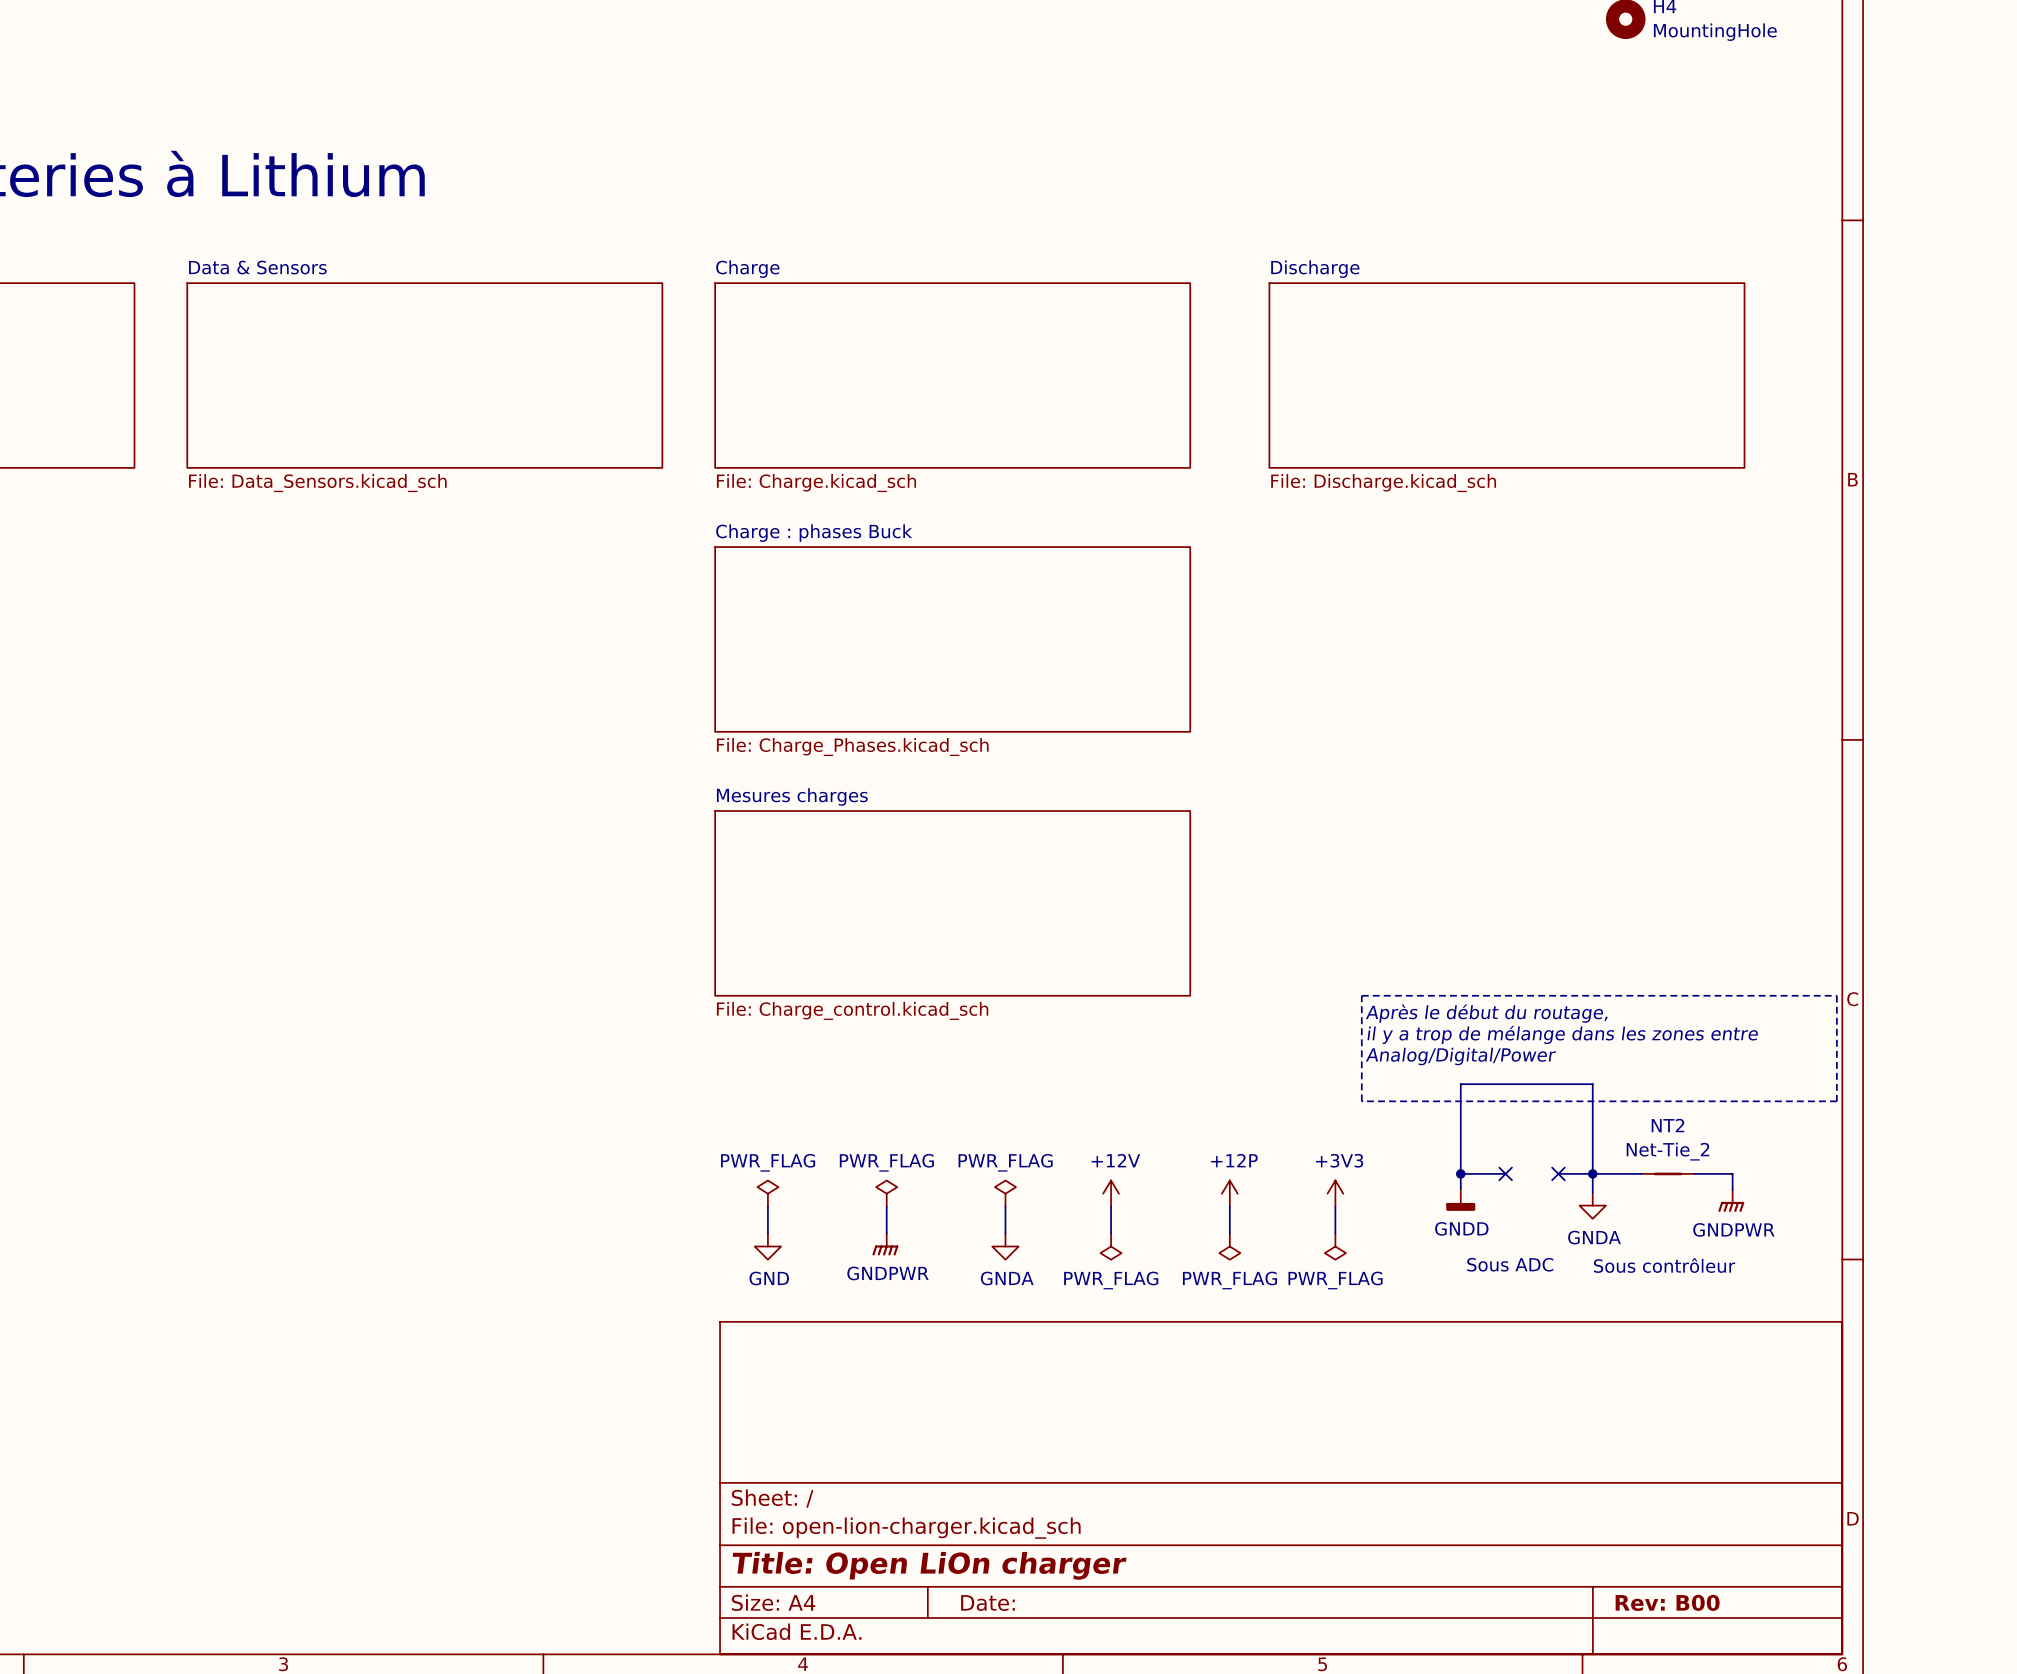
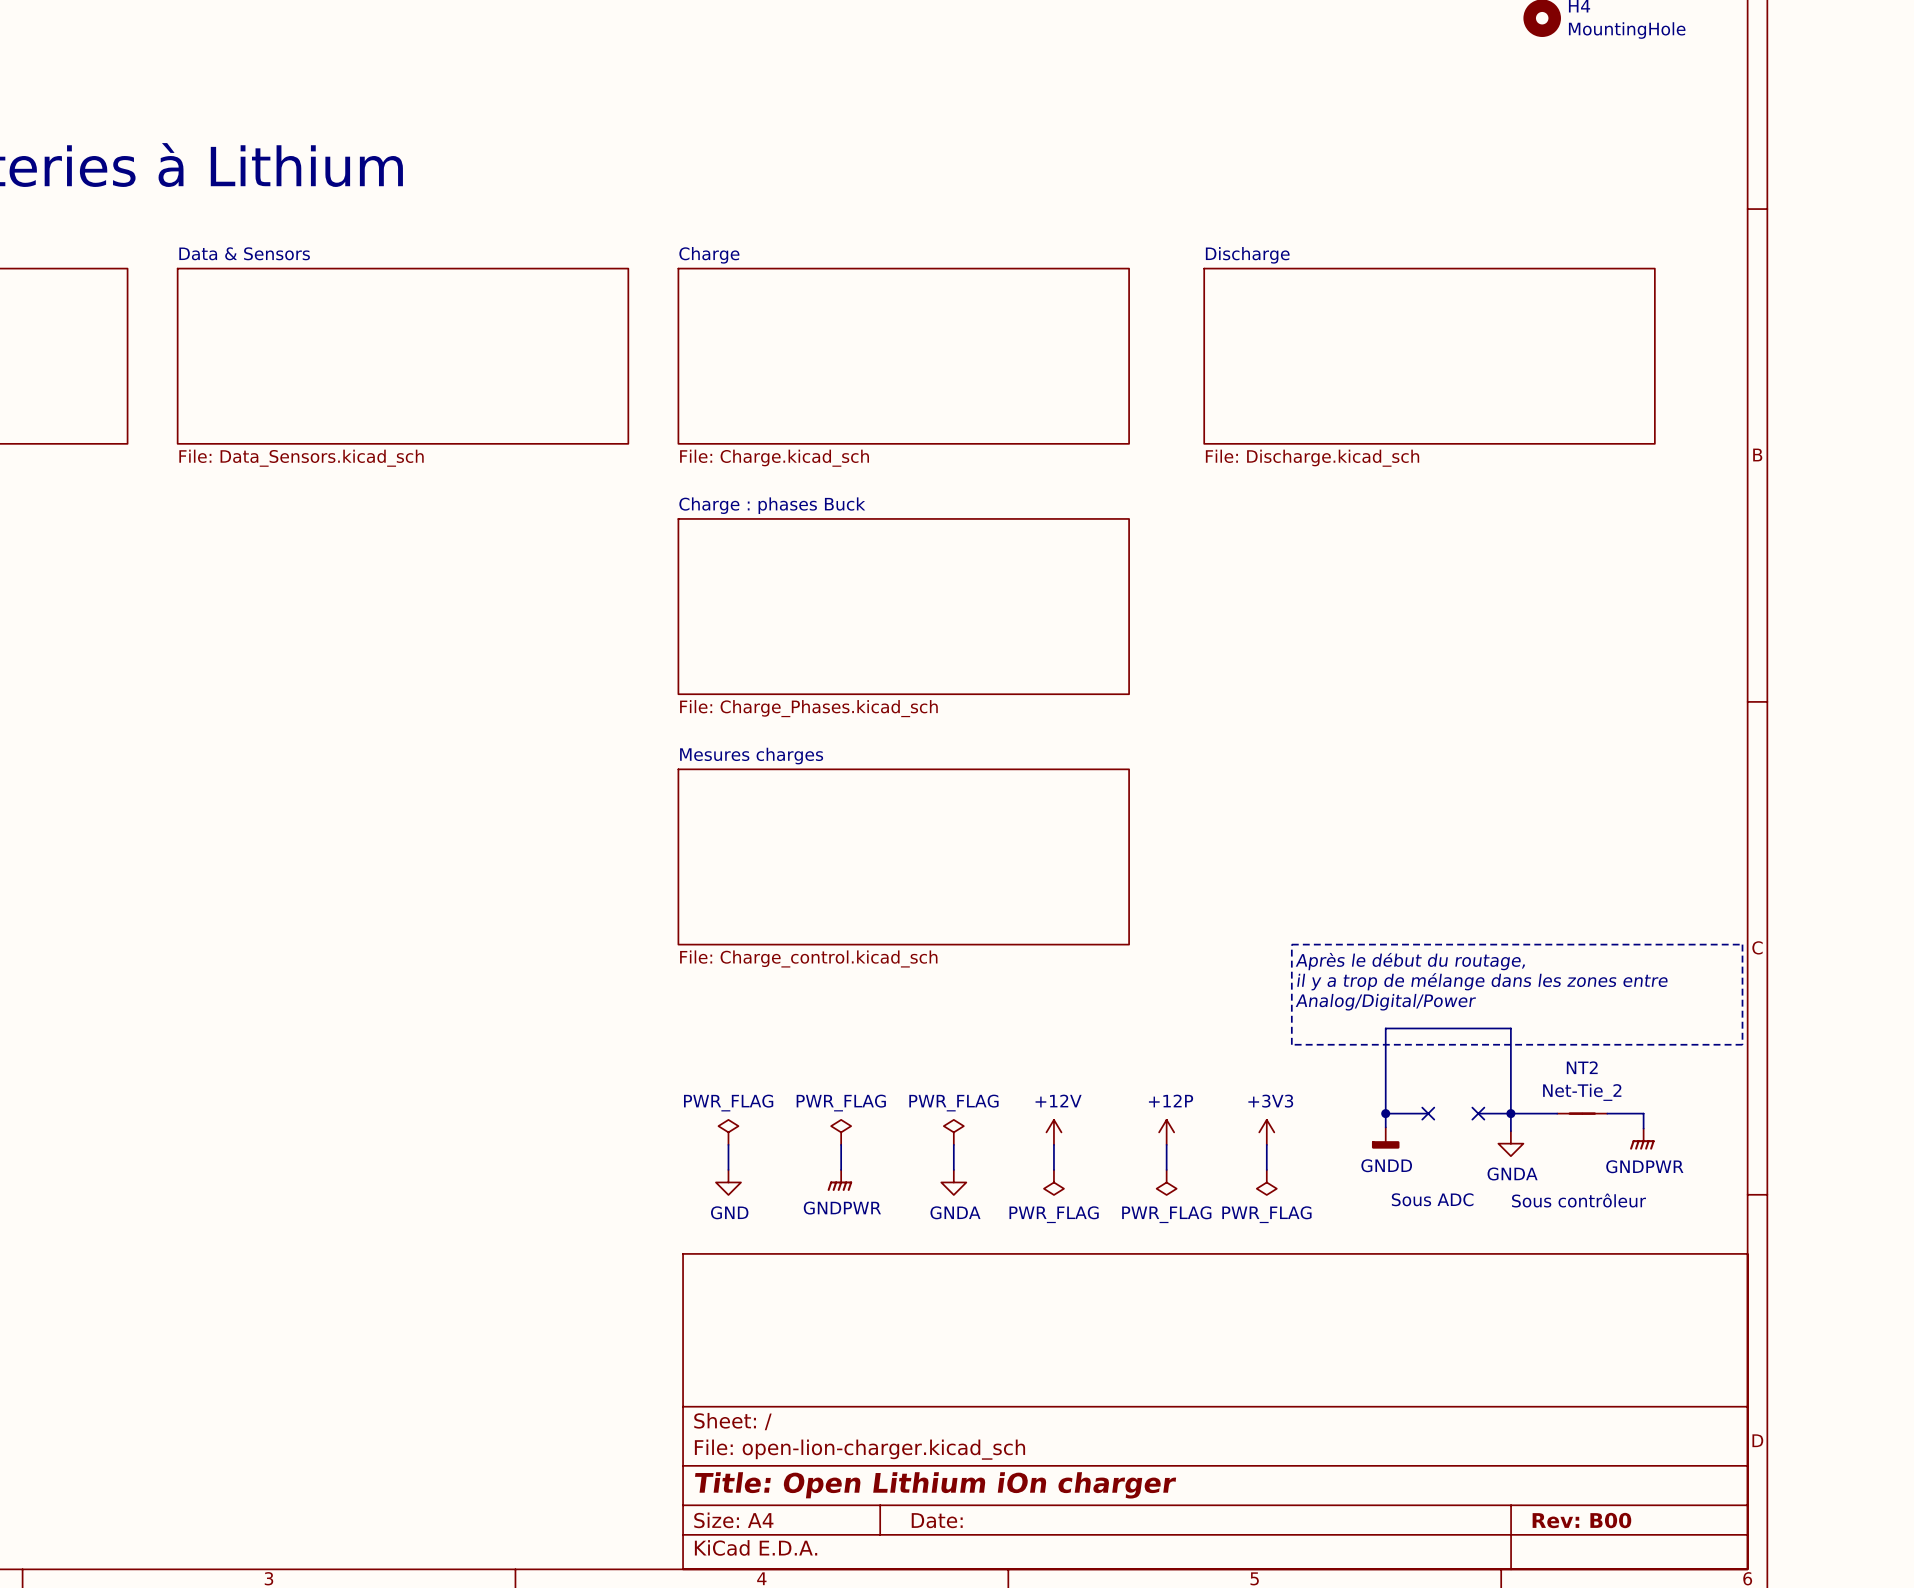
title block: Title: Open LiOn charger (929, 1565) -> Title: Open Lithium iOn charger (935, 1485)

